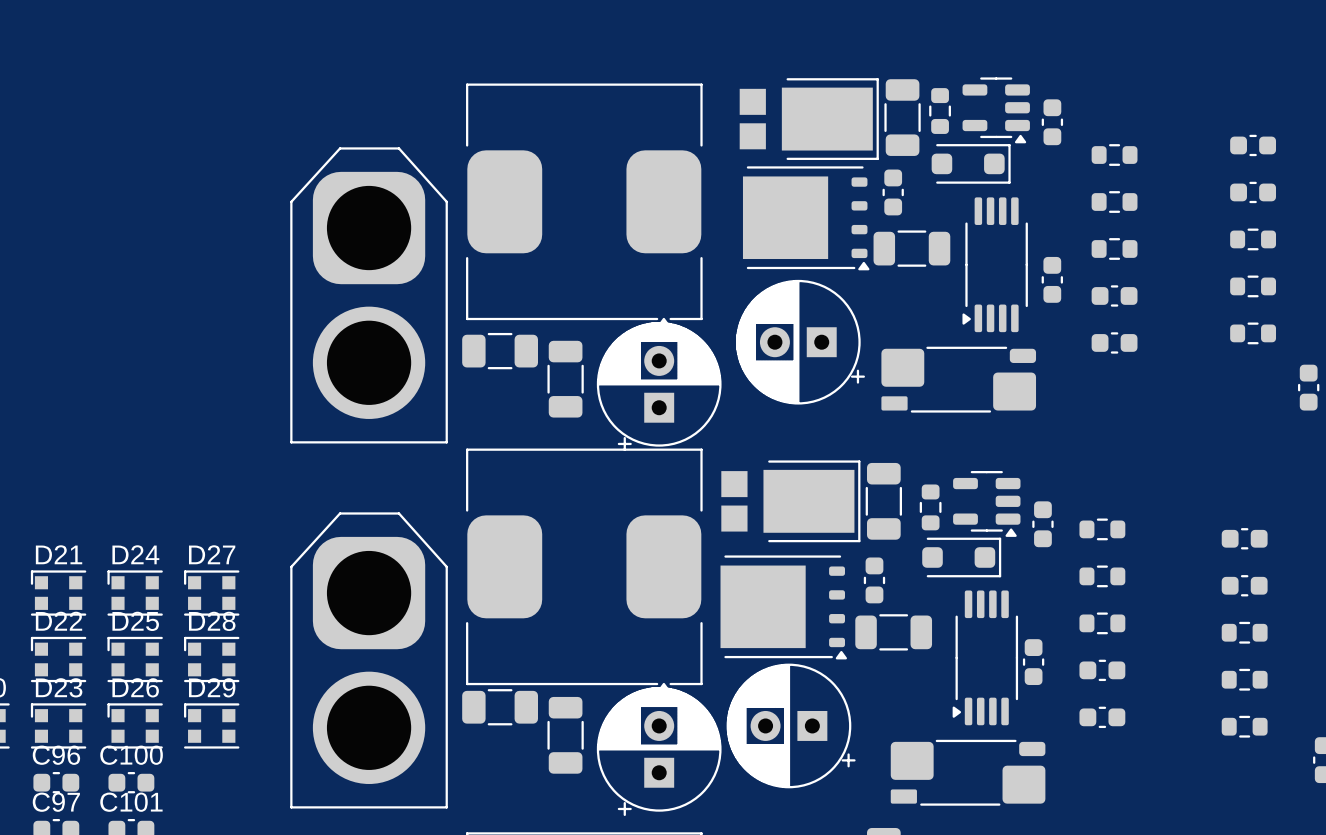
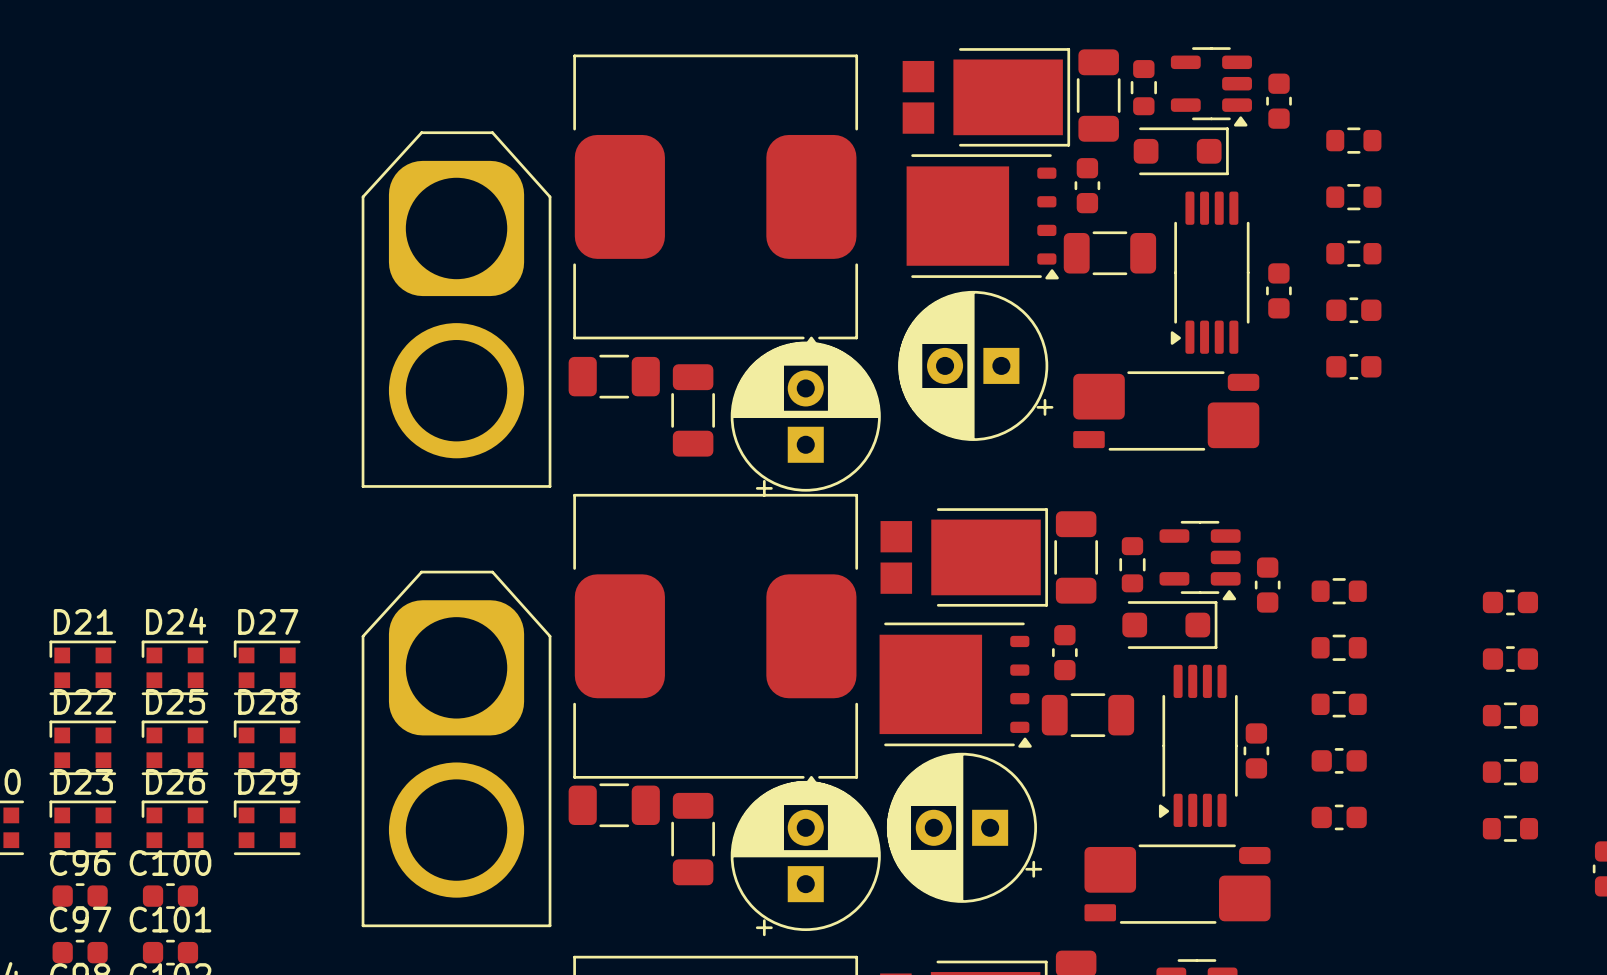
part: (1253, 145) -> none
part: (1253, 192) -> none
part: (1253, 239) -> none
part: (1253, 286) -> none
part: (1253, 333) -> none
part: (1308, 387) -> none

